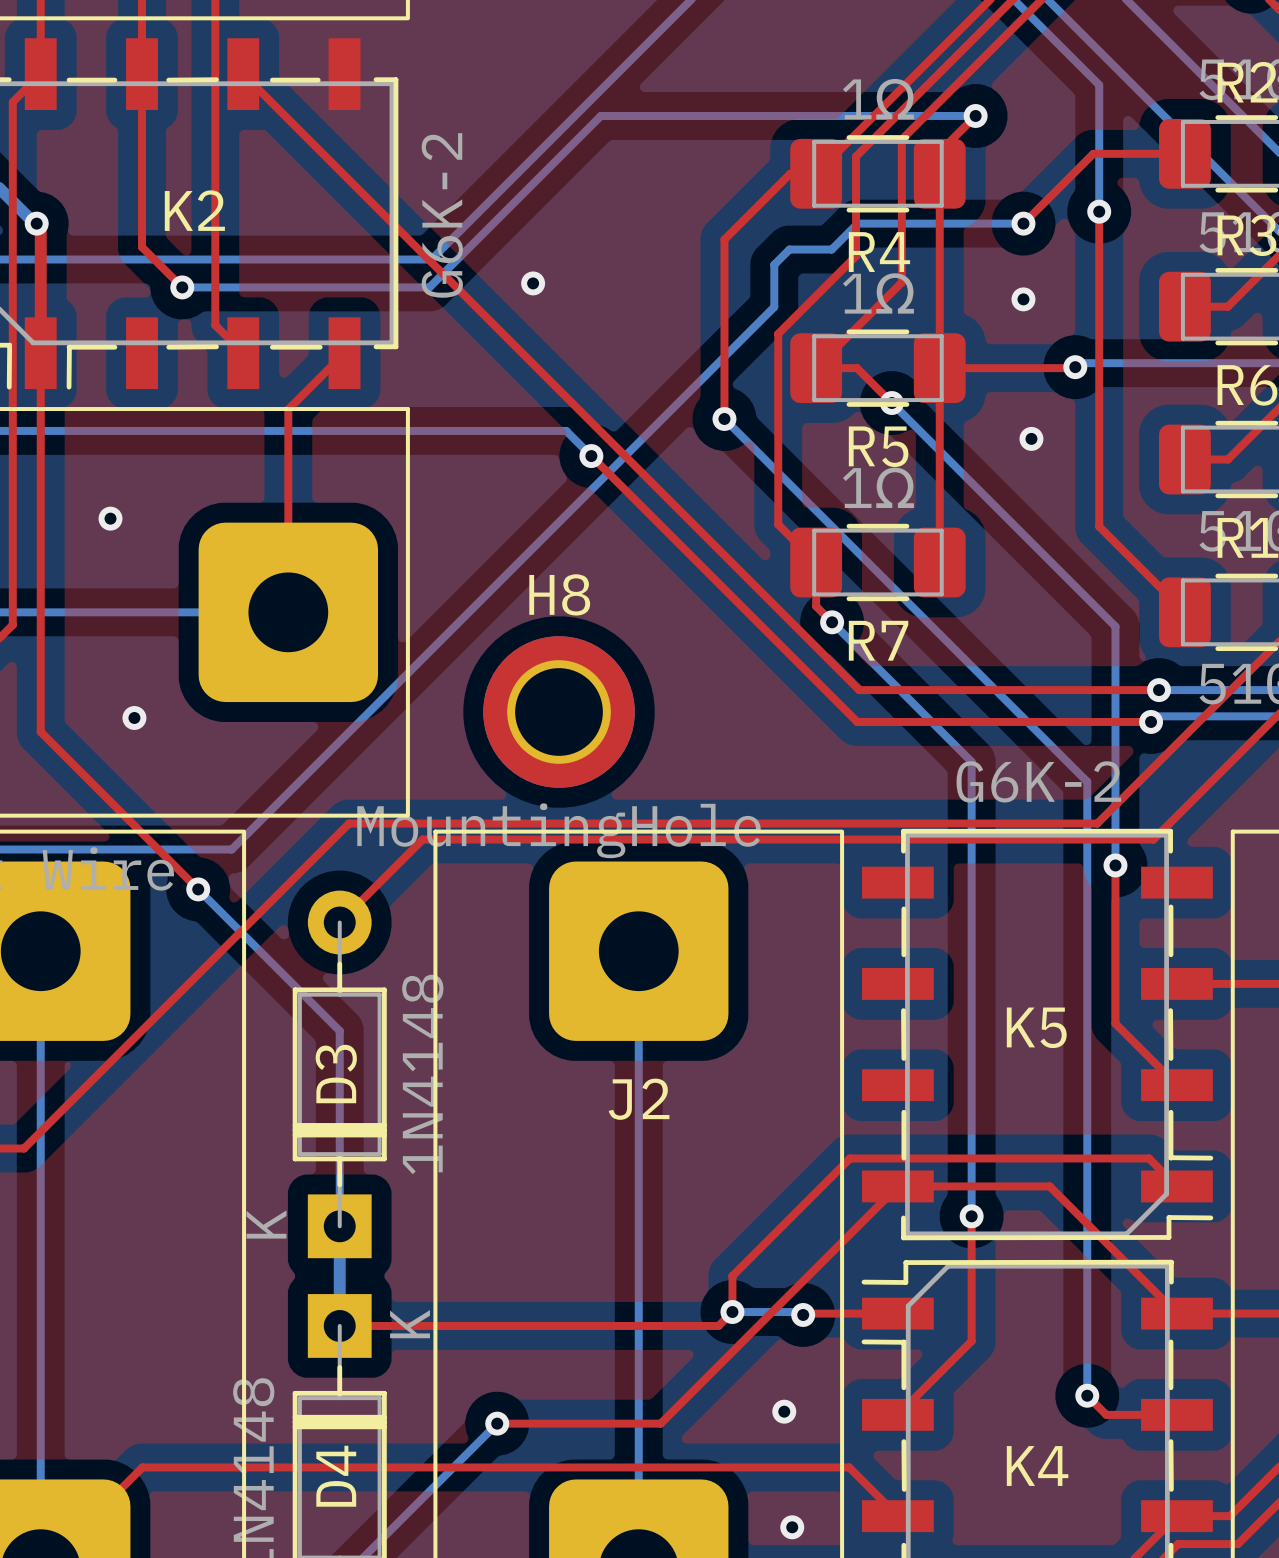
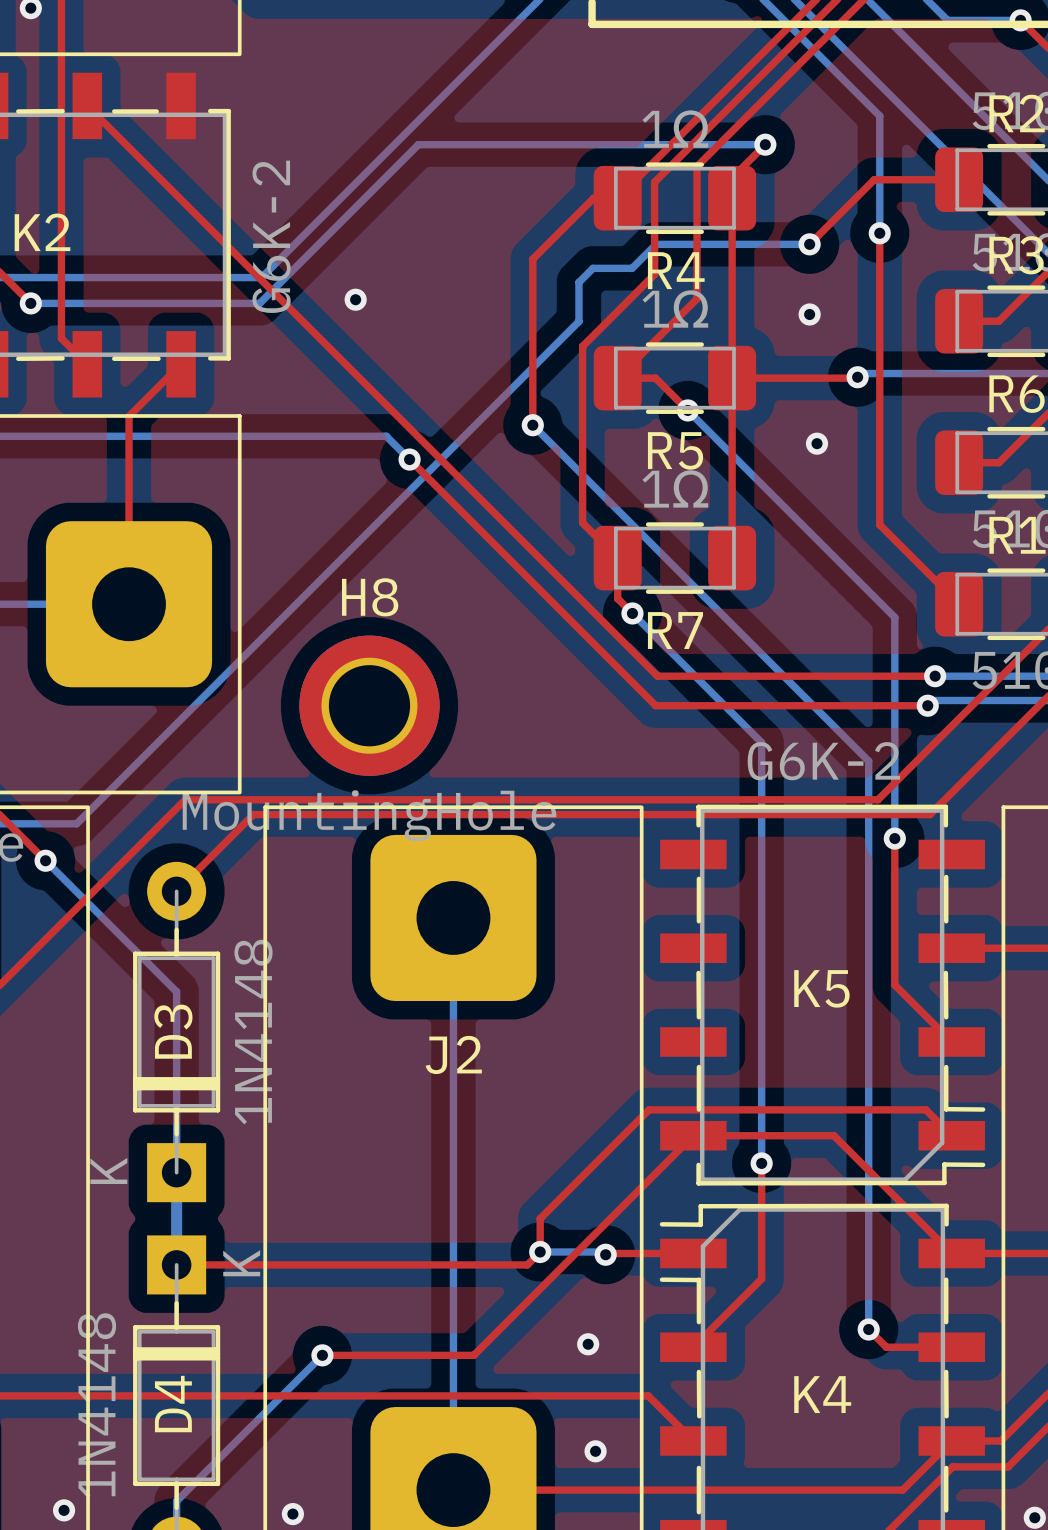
H8 position: (559, 712) -> (369, 705)

